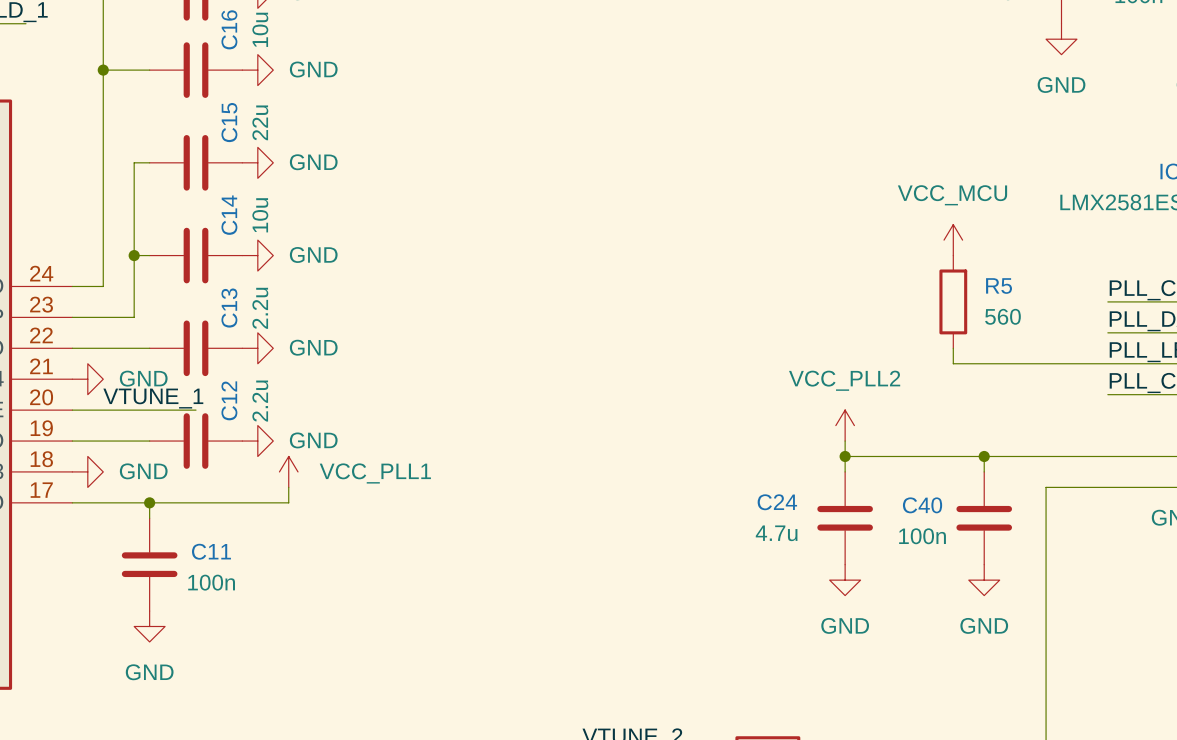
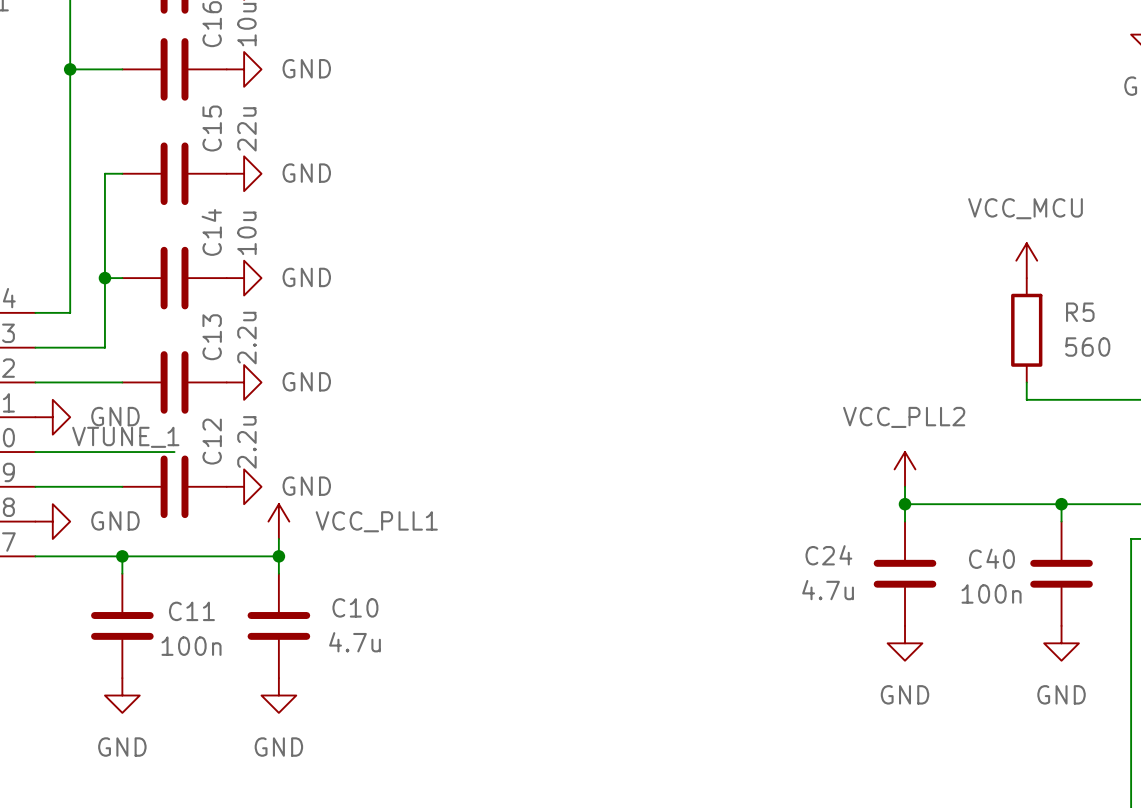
wire: none -> (278, 556) (278, 573)
junction: none -> (278, 556)
C10: none -> 4.7u (278, 625)
power symbol: none -> GND (278, 695)

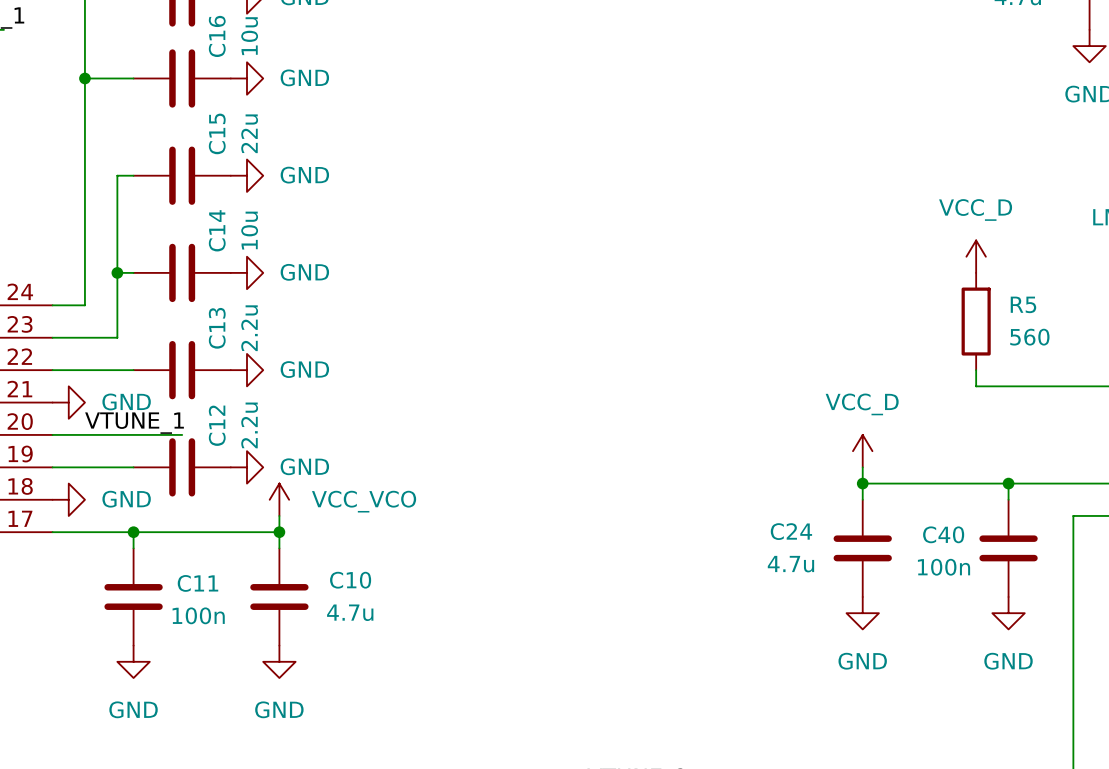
power symbol: VCC_MCU (1026, 260) -> VCC_D (976, 256)
power symbol: VCC_PLL2 (905, 469) -> VCC_D (862, 451)
power symbol: VCC_PLL1 (278, 521) -> VCC_VCO (279, 499)

